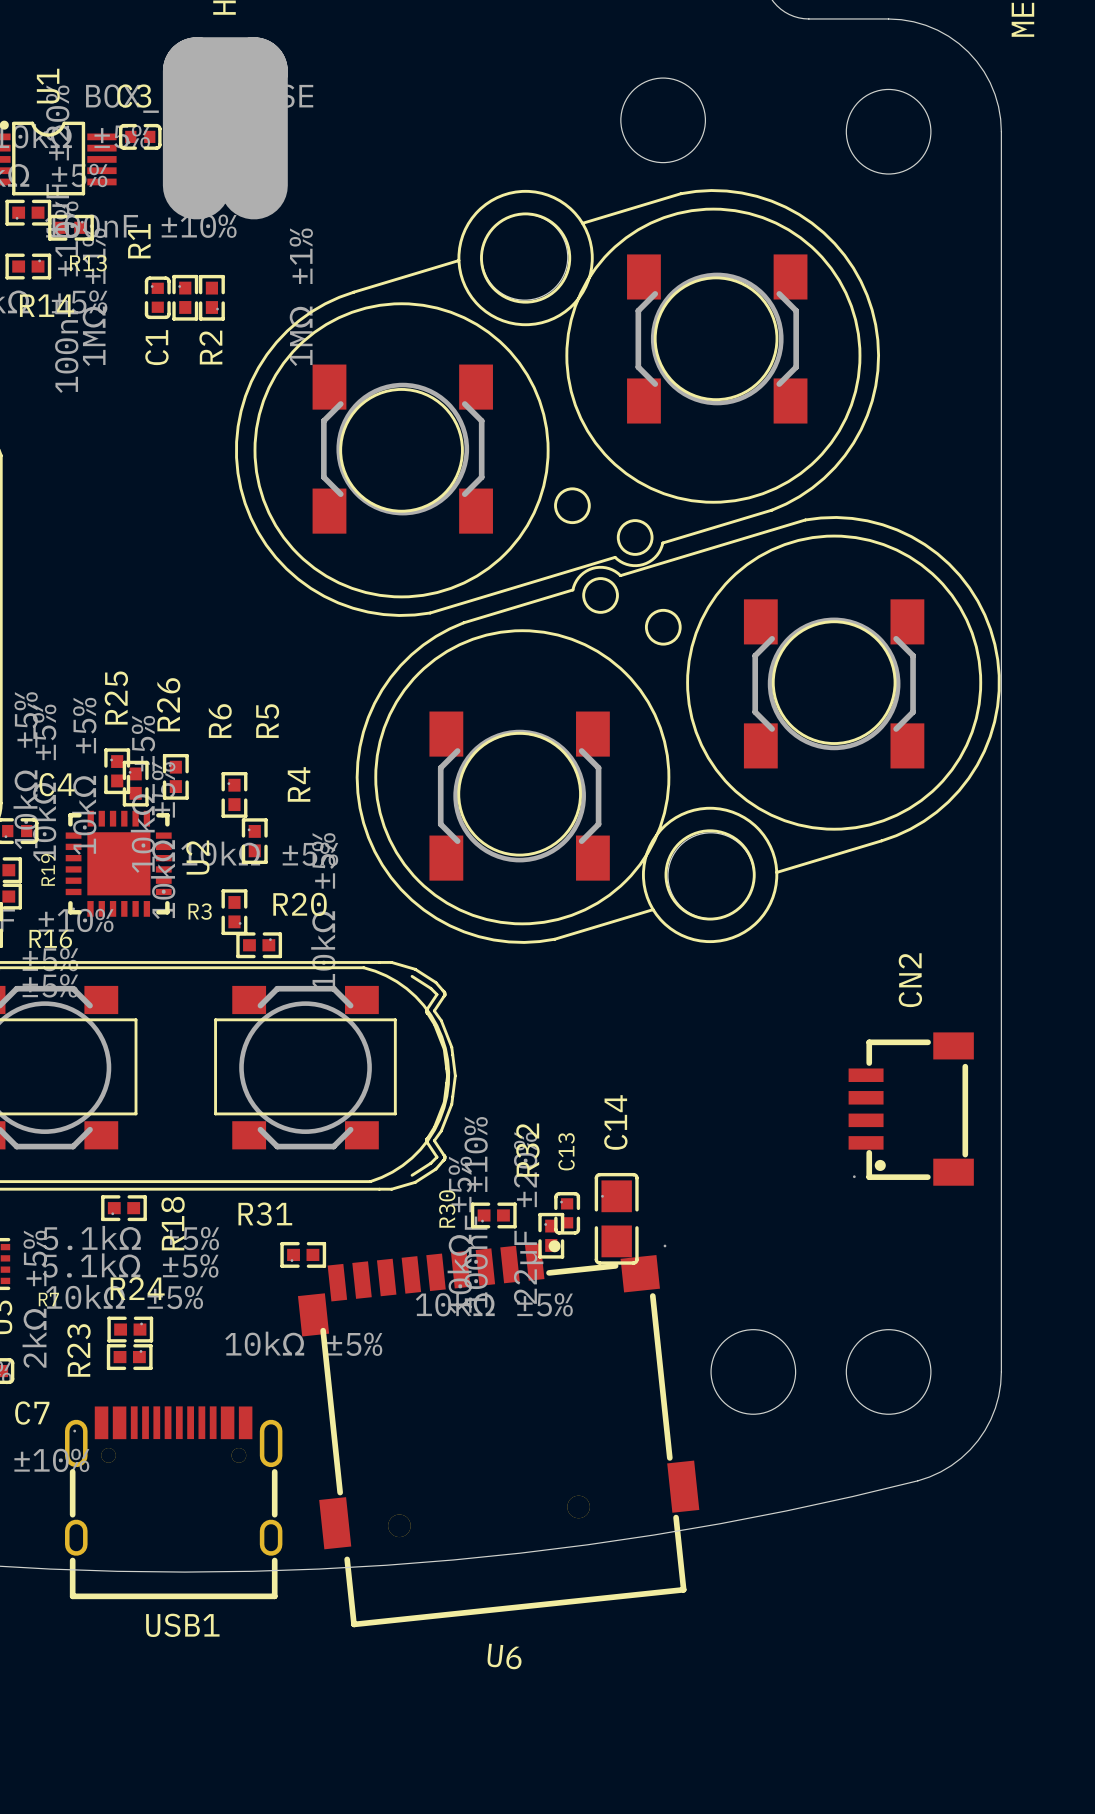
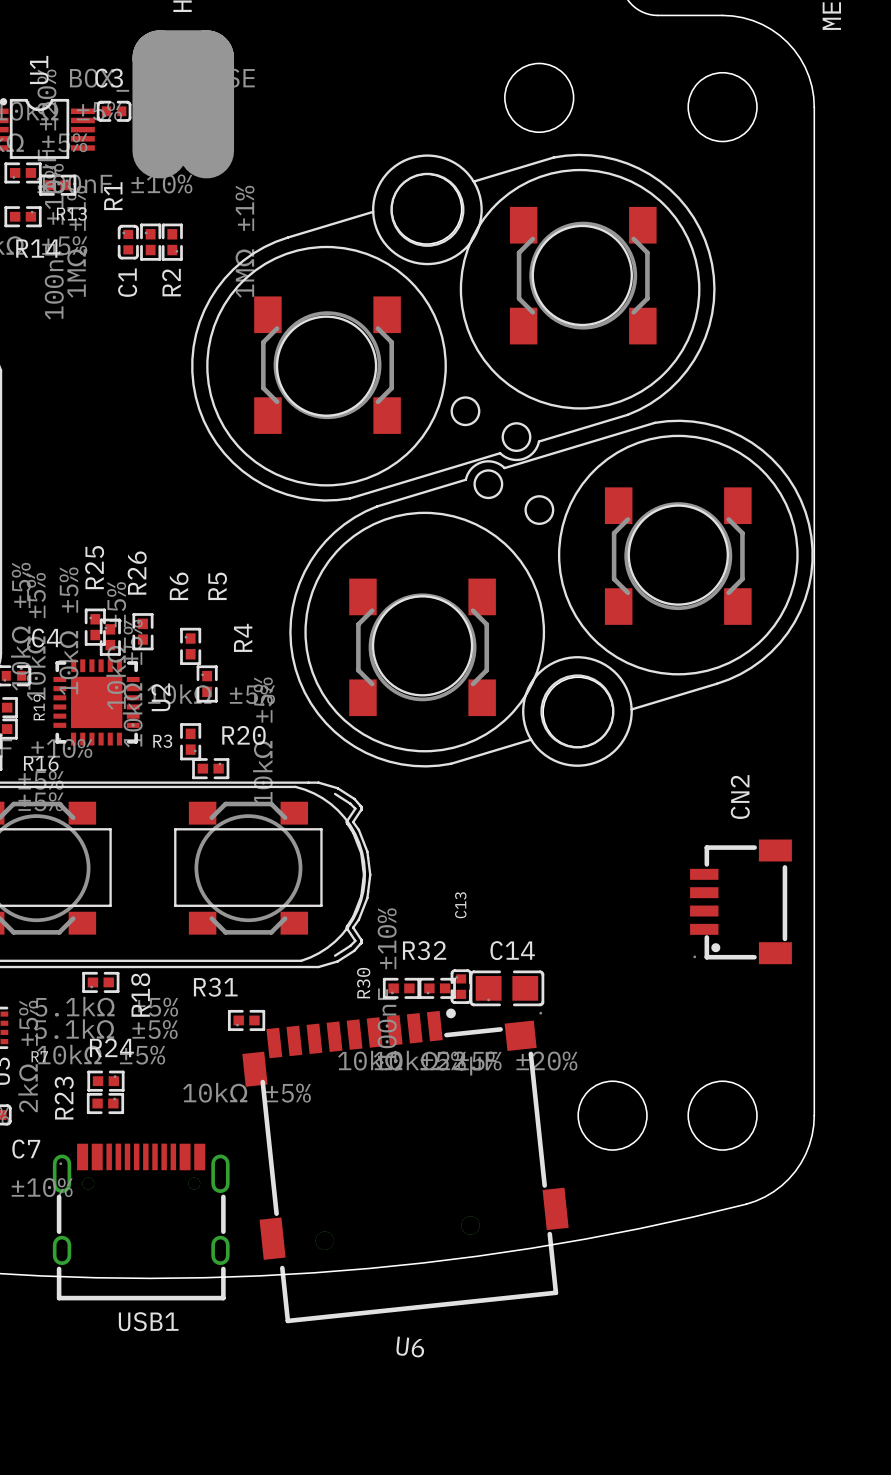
C13 name position: C13 (566, 1151) -> C13 (460, 905)
C14 rotation: 0° (616, 1218) -> 90° counterclockwise (506, 988)
R32 rotation: 0° (551, 1235) -> 90° counterclockwise (437, 988)

